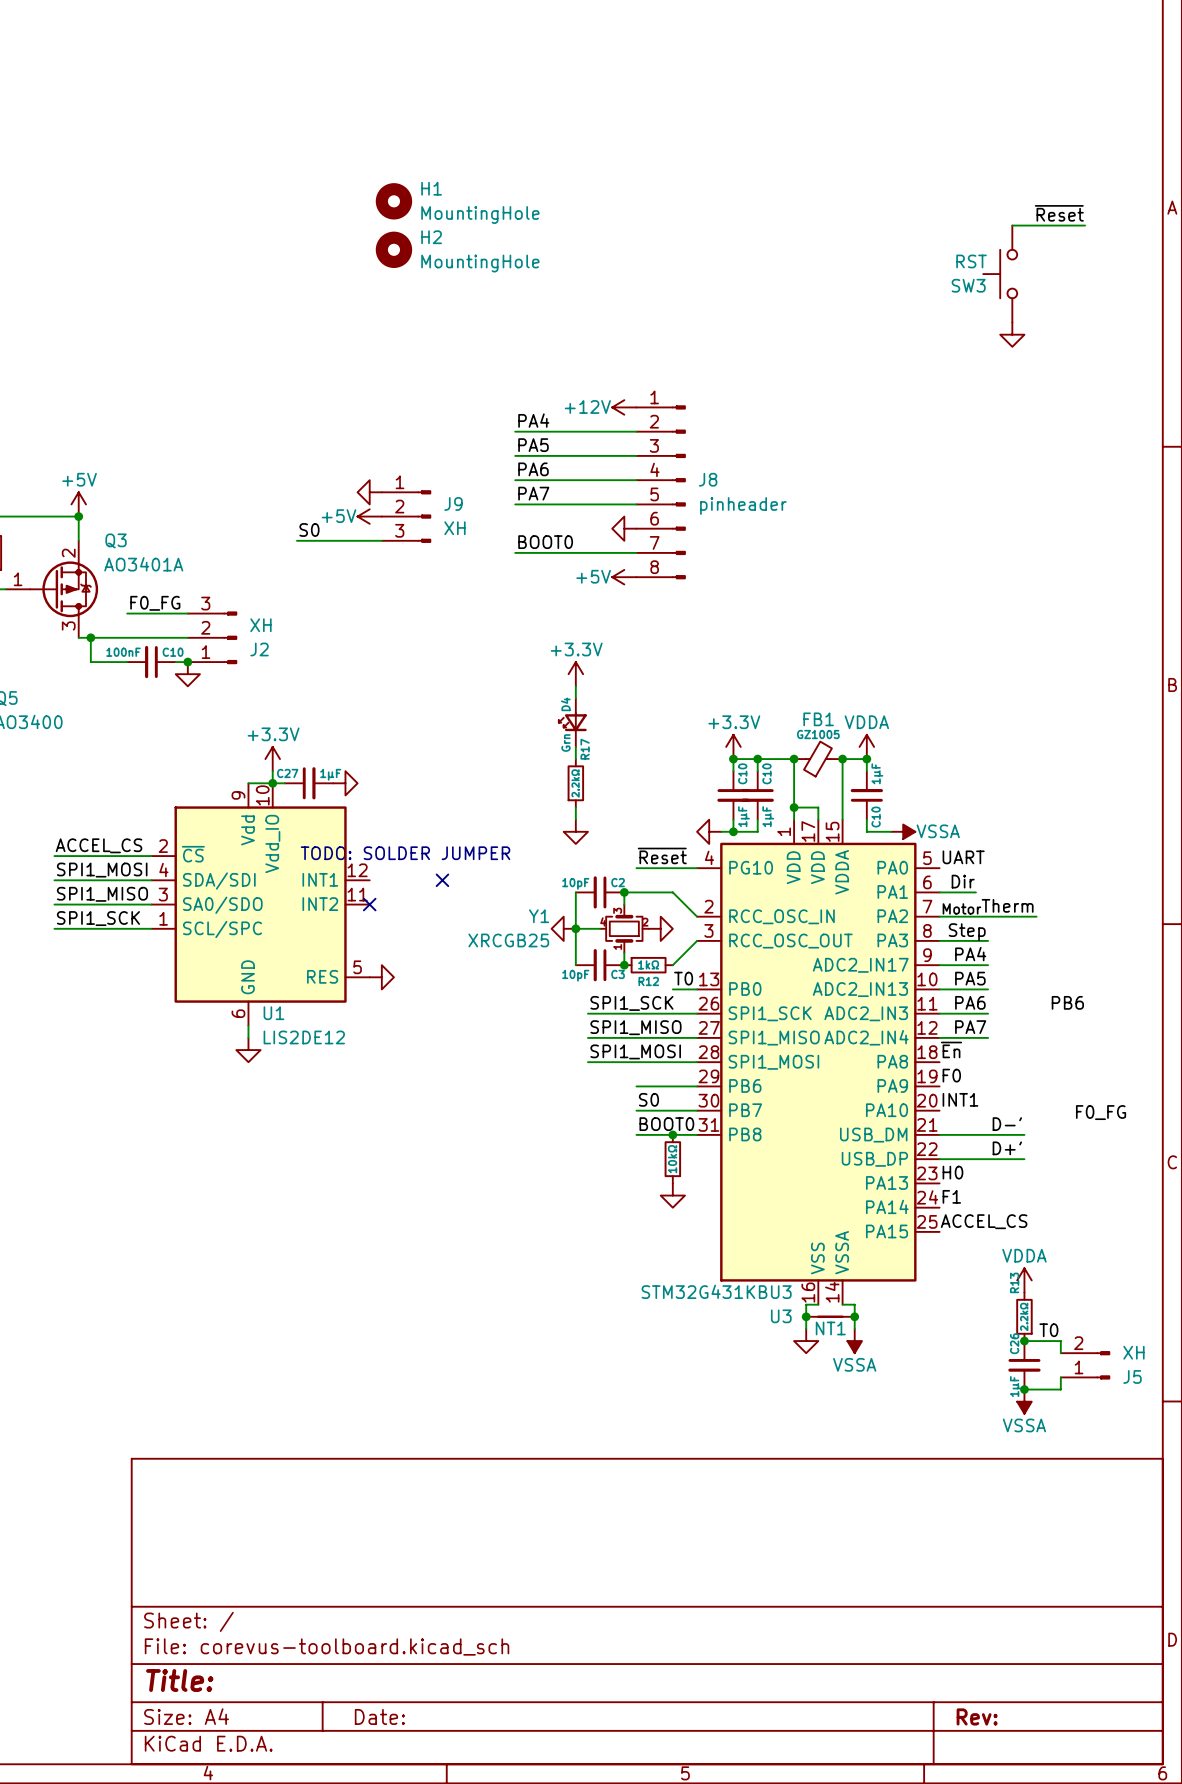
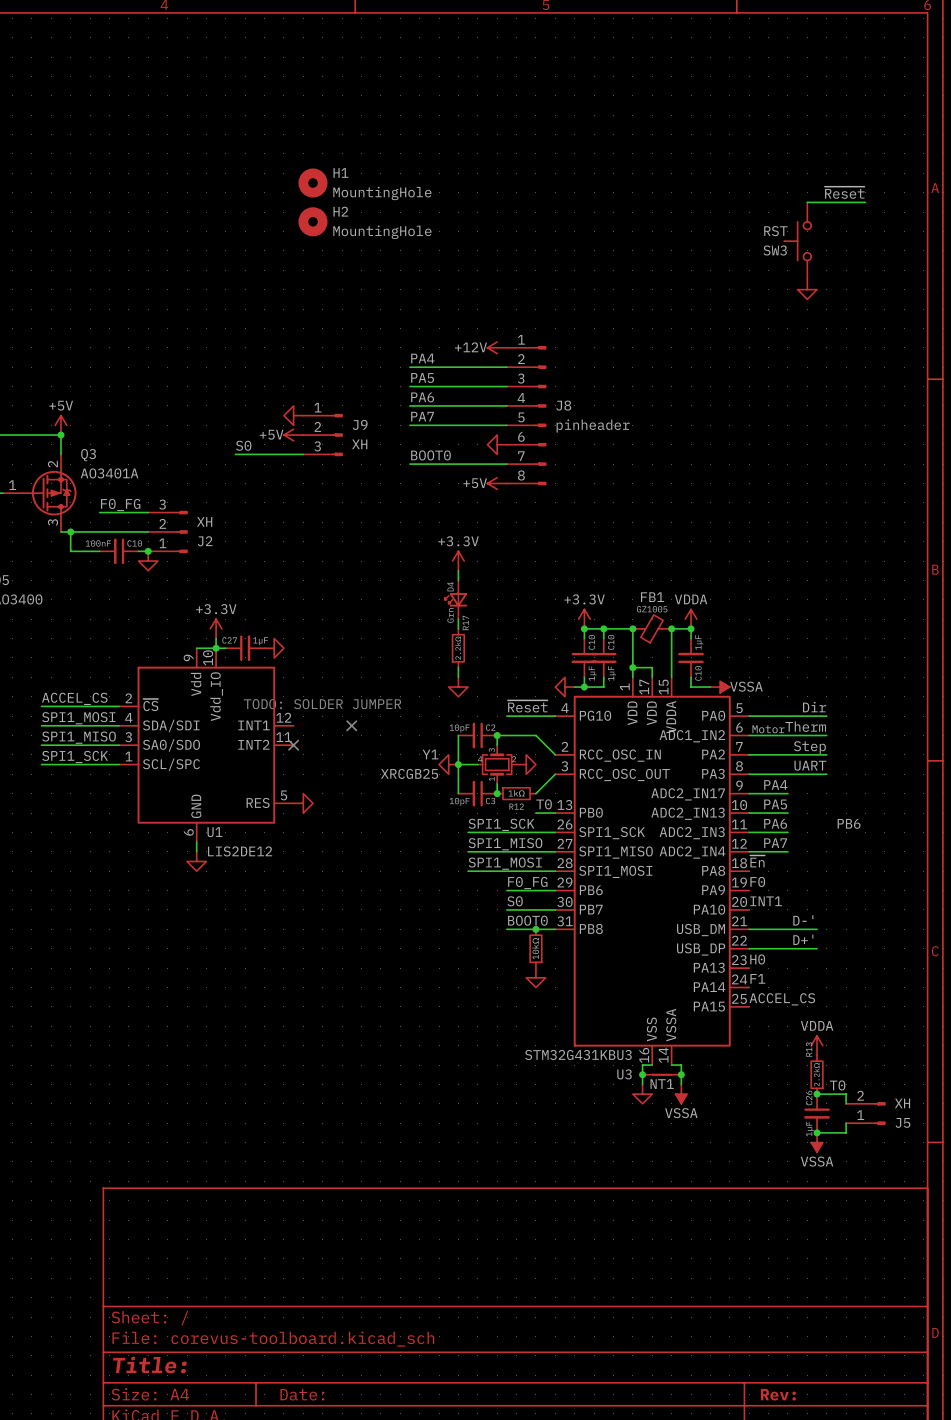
label position: UART (963, 857) -> UART (810, 765)
wire: none -> (749, 716) (826, 716)
label position: Dir (963, 881) -> Dir (814, 707)
label: none -> MotorTherm (789, 727)
U3 pin name: PA1 (892, 891) -> ADC1_IN2 (692, 736)
wire: none -> (778, 735) (826, 735)
label: MotorTherm (988, 906) -> Step (809, 747)
label: Step (967, 932) -> none
wire: none -> (787, 774) (826, 774)
label: none -> F0_FG (527, 883)
label: F0_FG (1101, 1112) -> none

